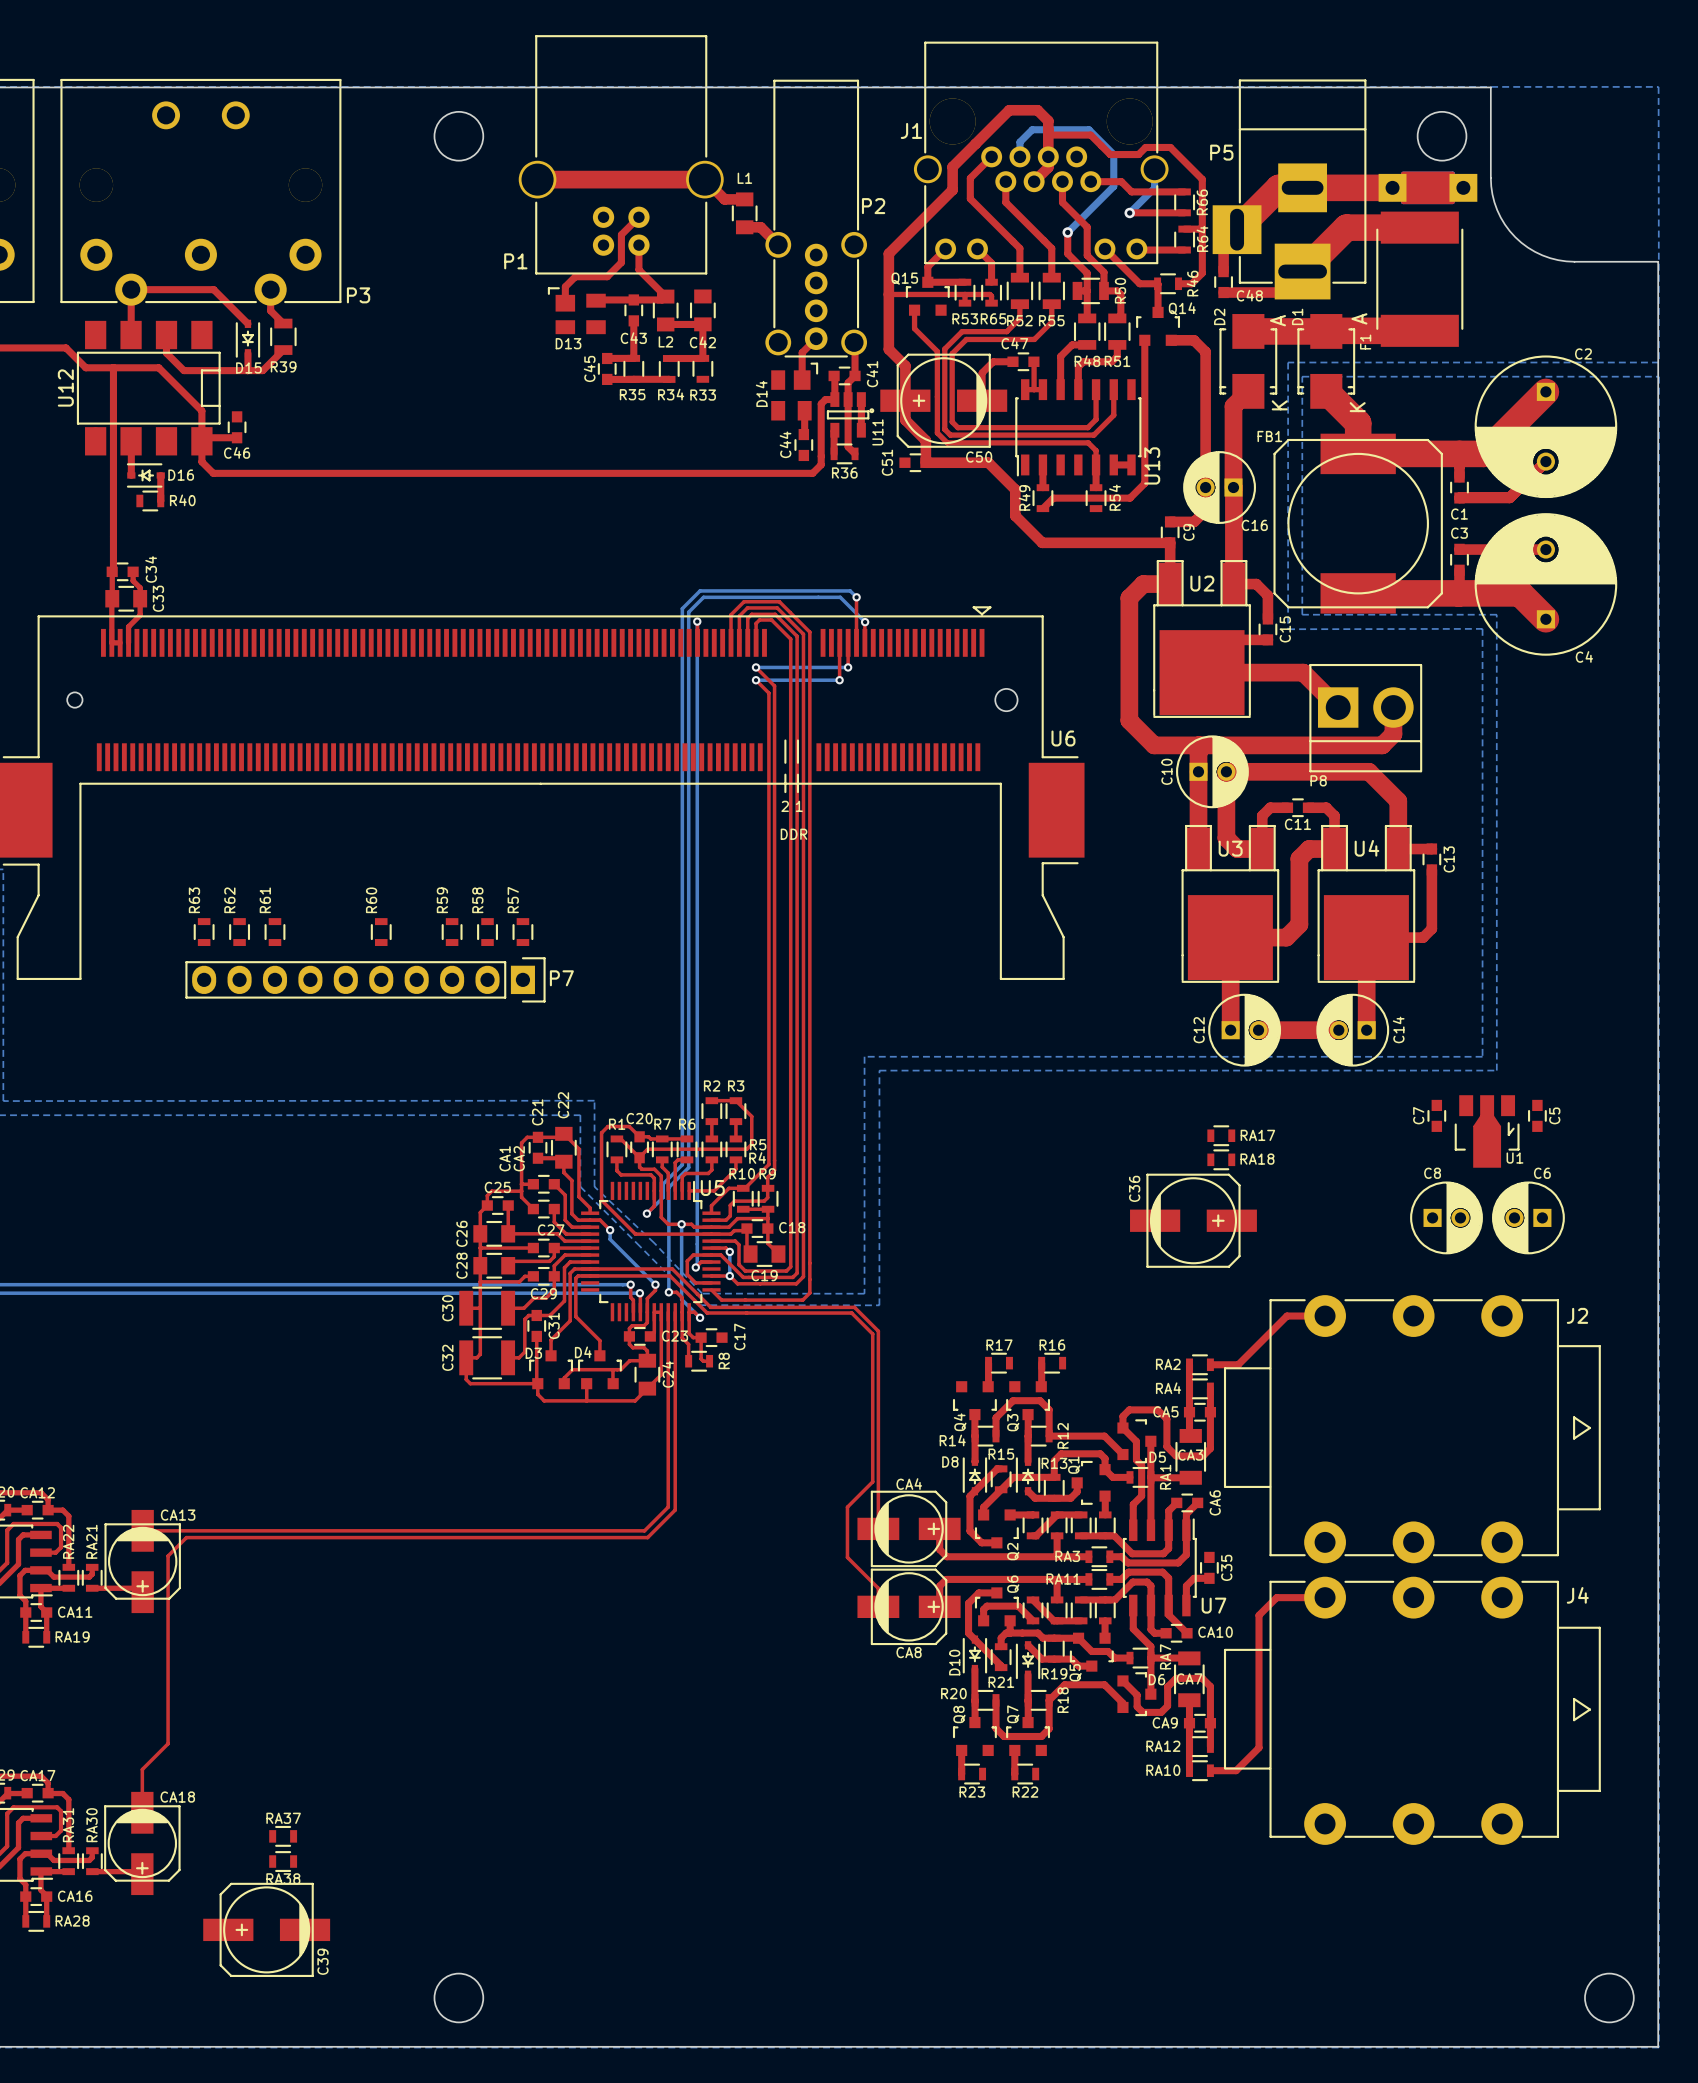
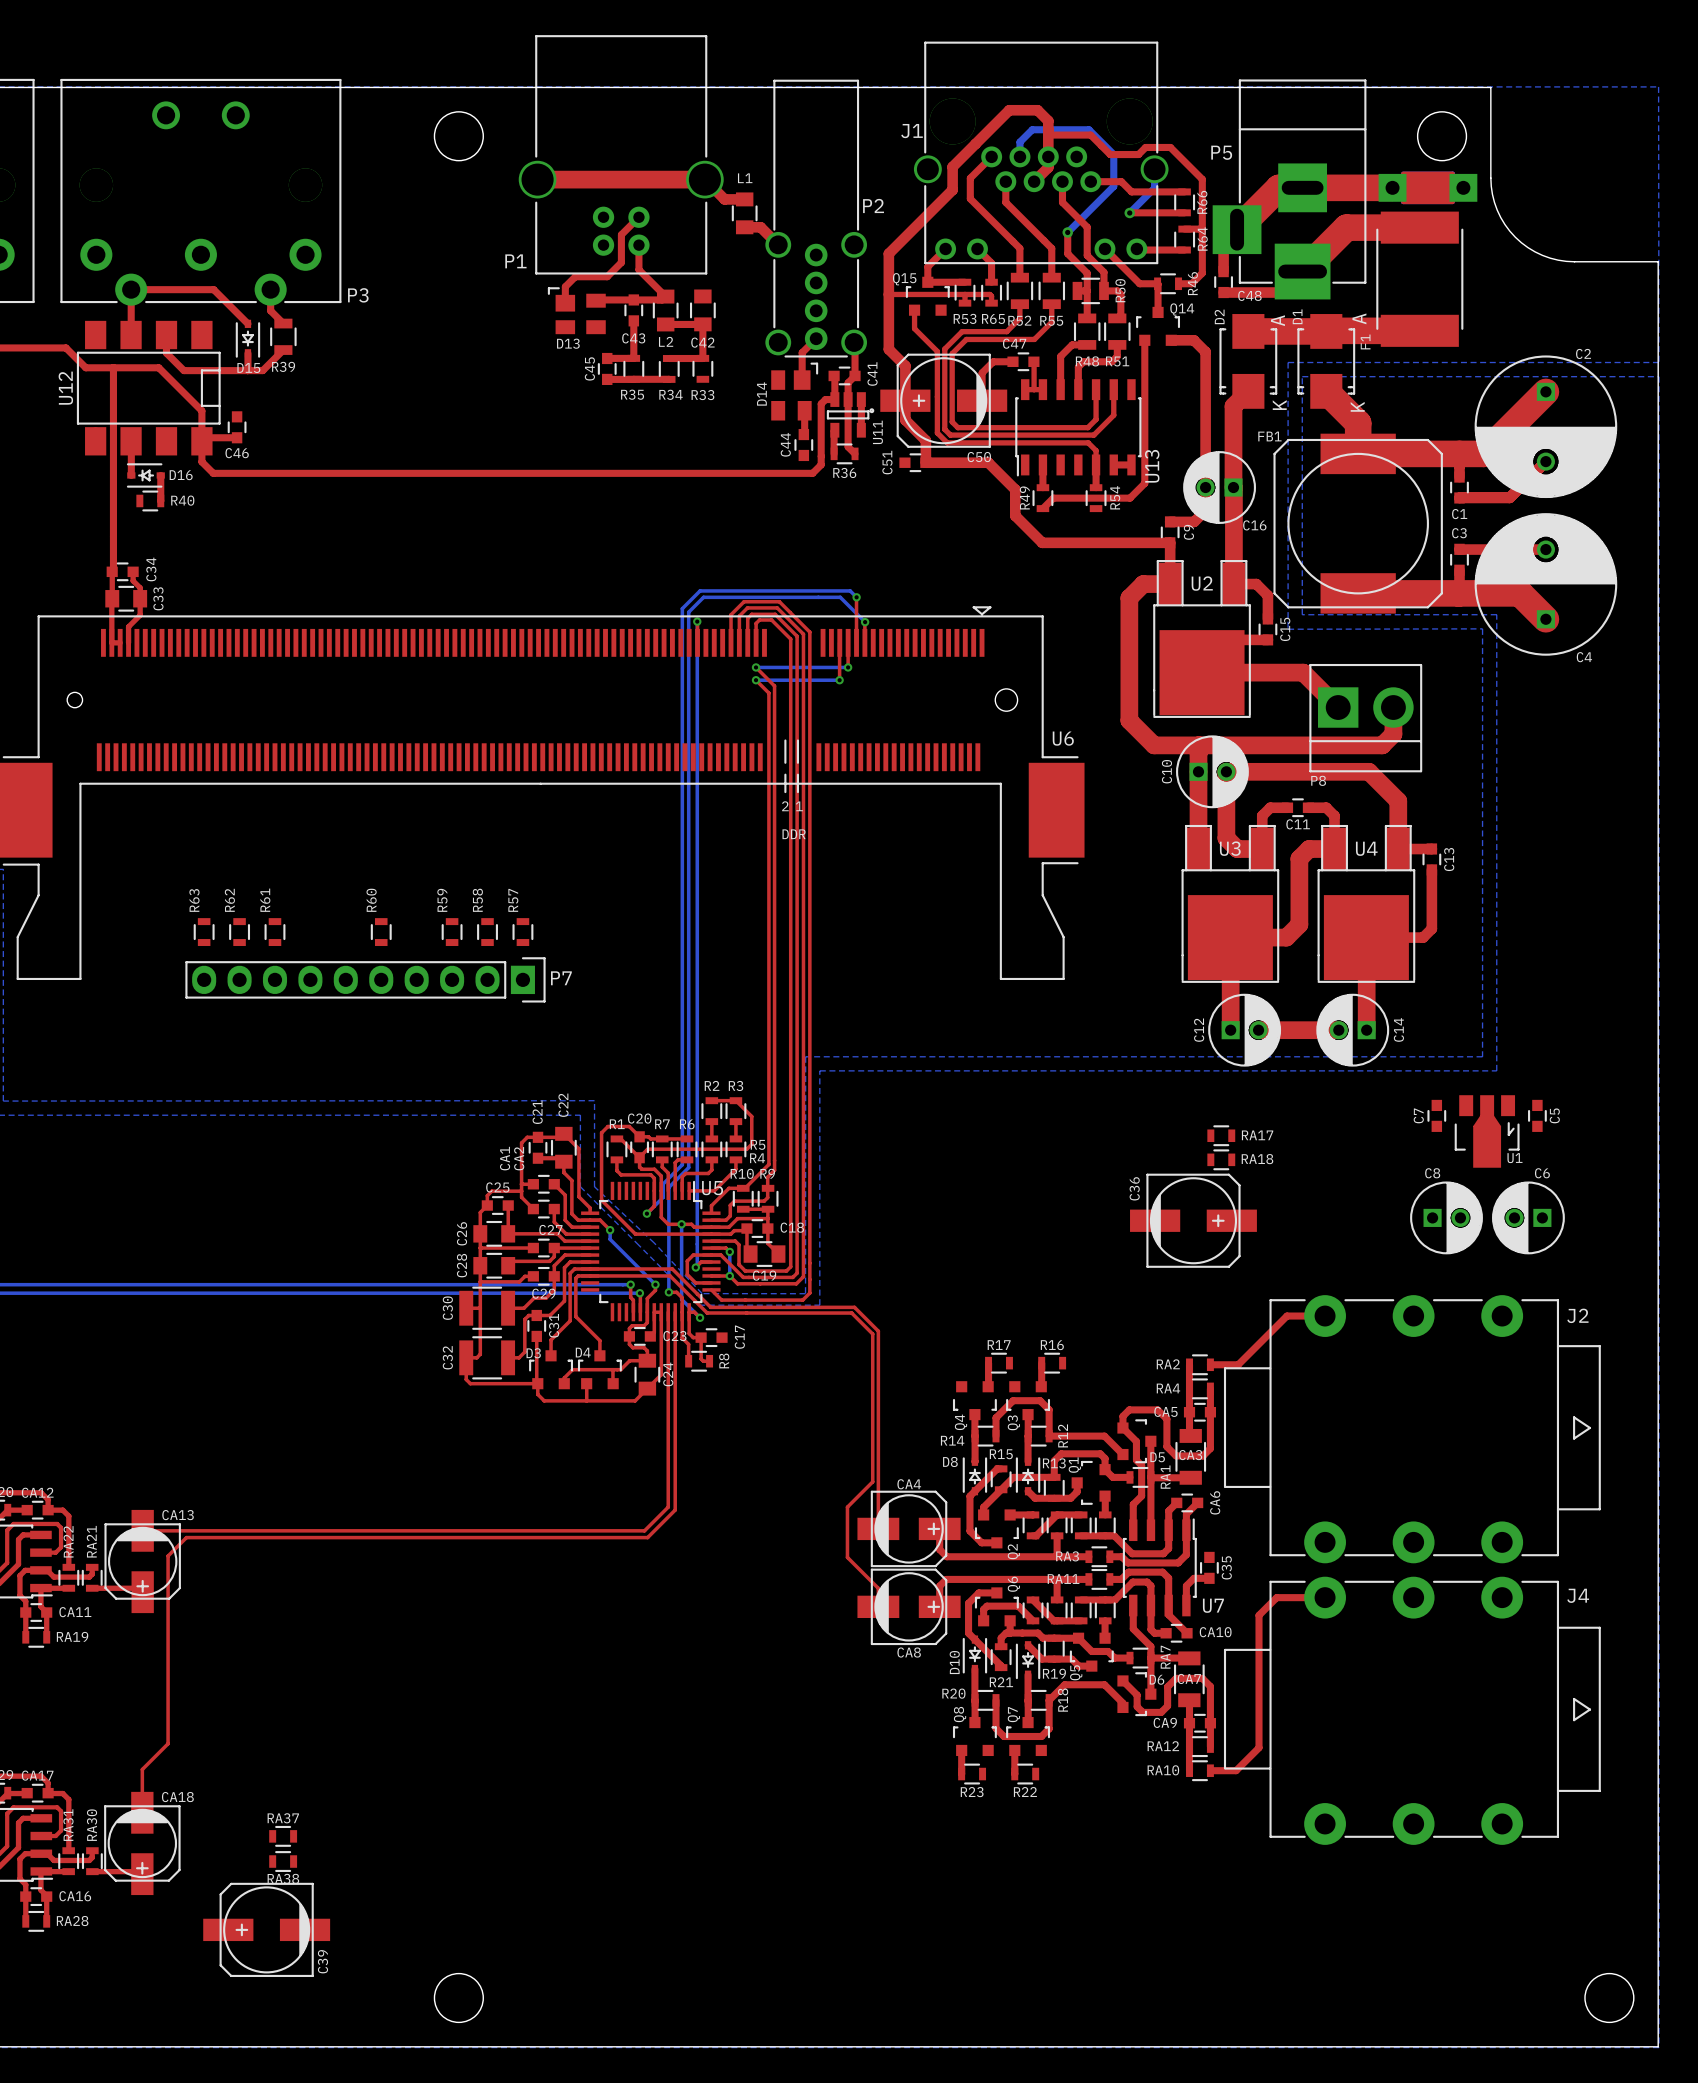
bottom zone outline: (1496, 614) (1496, 1070) (879, 1070) (879, 1305) (699, 1305) -> (1496, 614) (1496, 1070) (819, 1070) (819, 1305) (699, 1305)
bottom zone outline: (1482, 1056) (864, 1056) (864, 1293) (702, 1293) -> (1482, 1056) (805, 1056) (805, 1293) (702, 1293)

